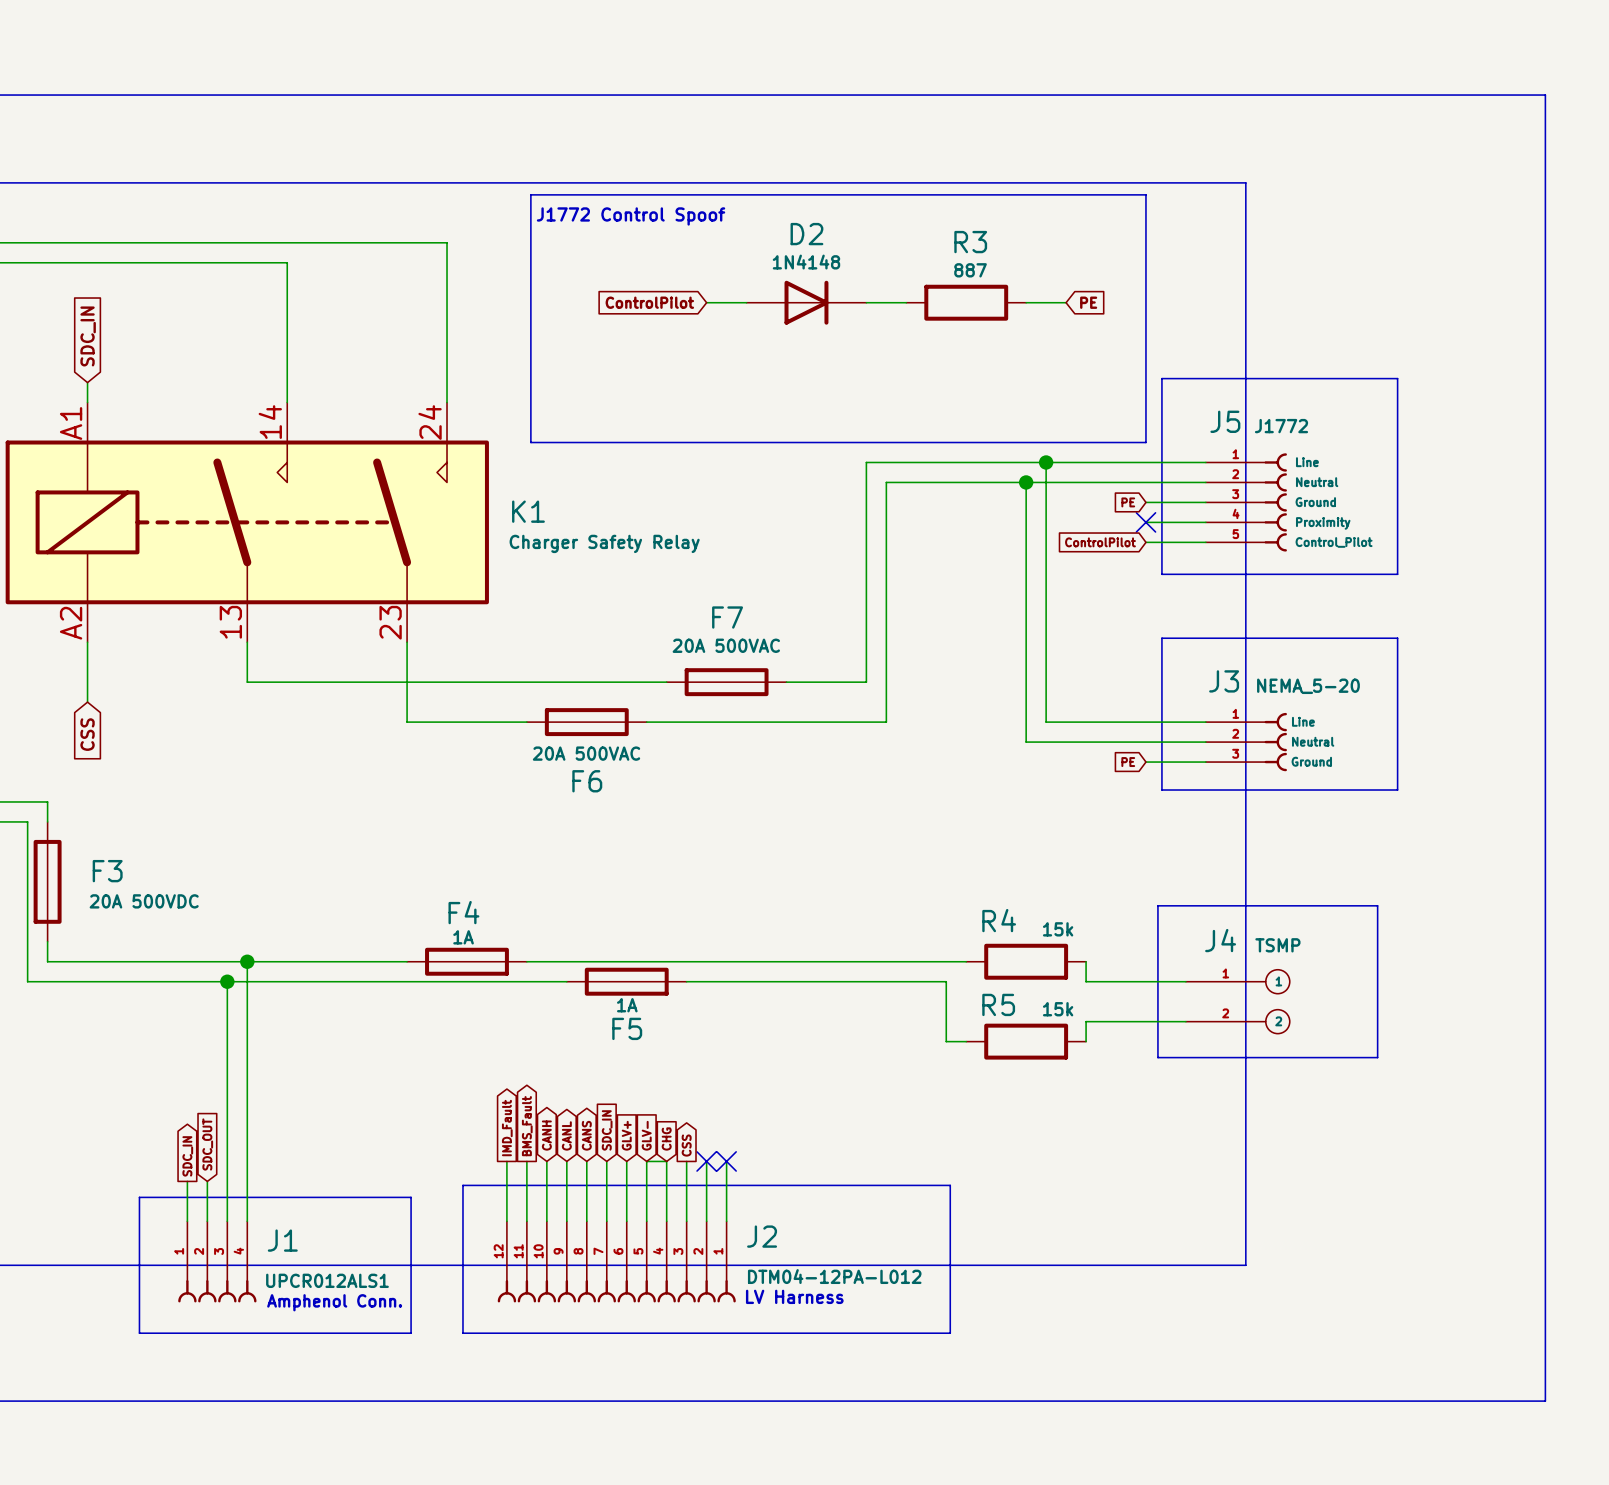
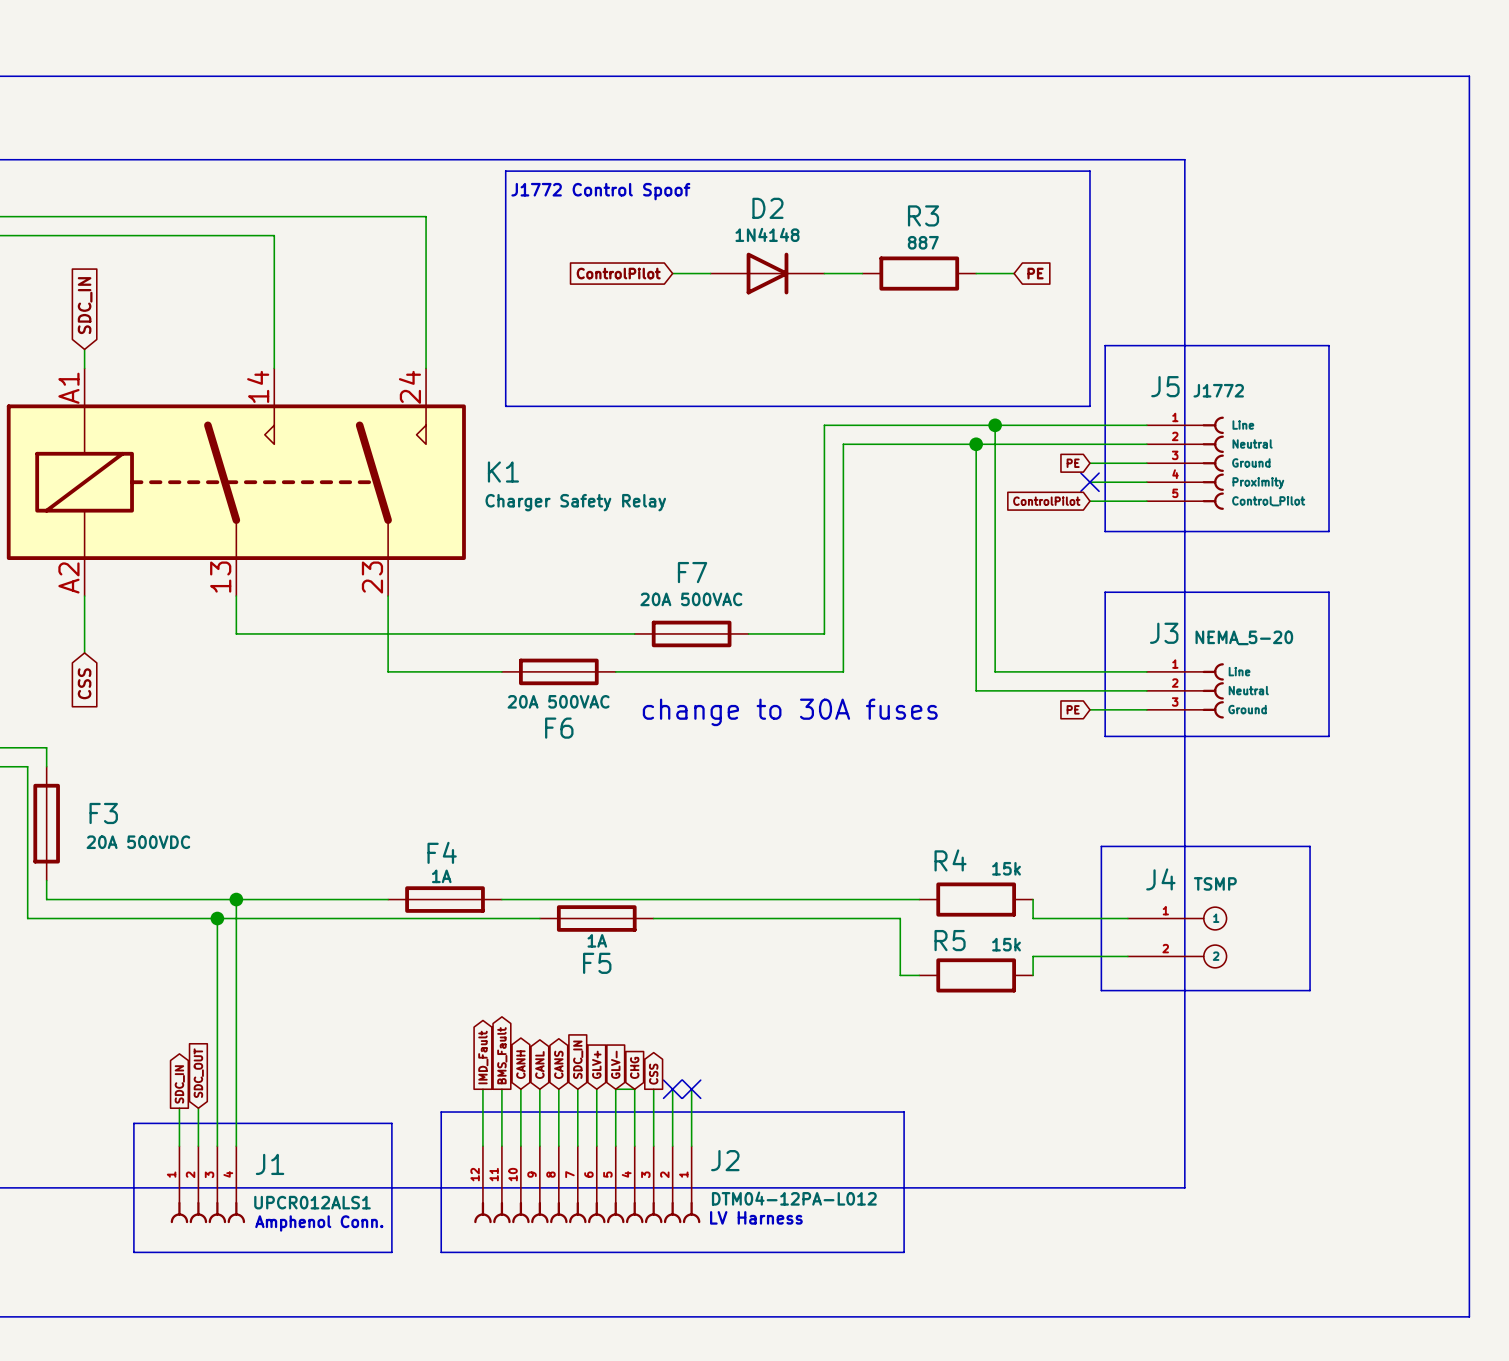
text: none -> change to 30A fuses (790, 712)

